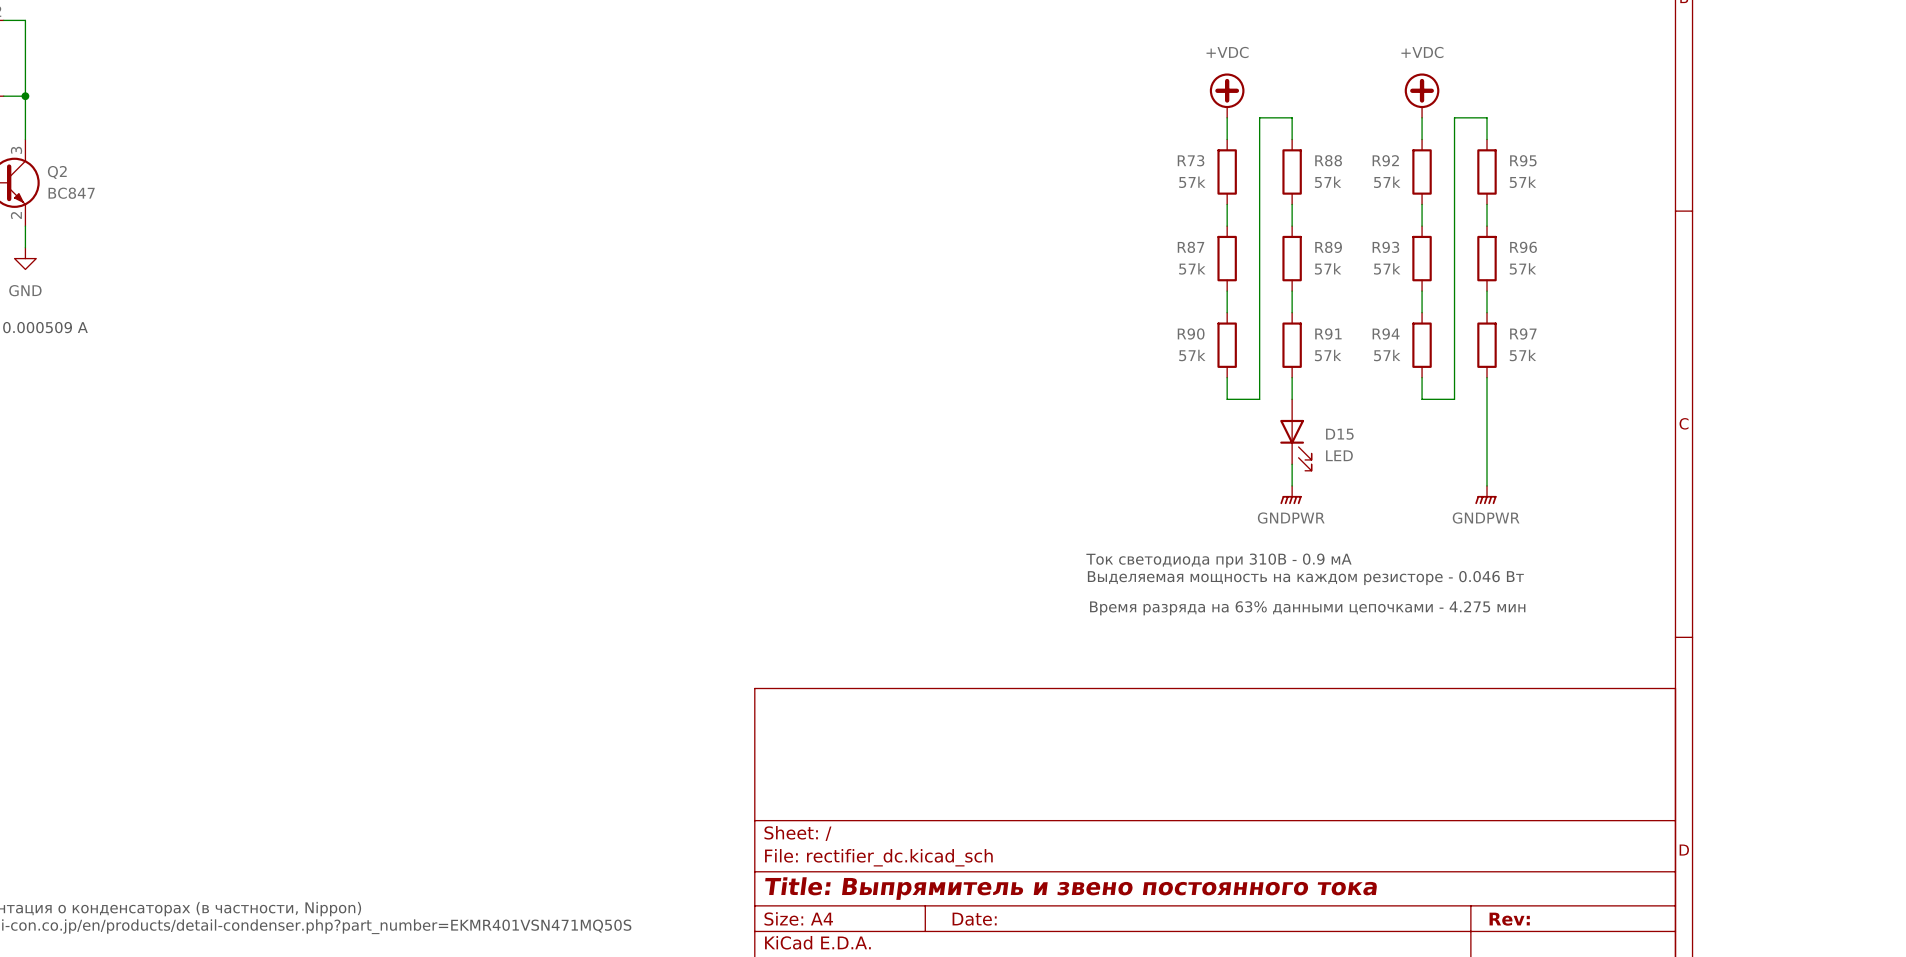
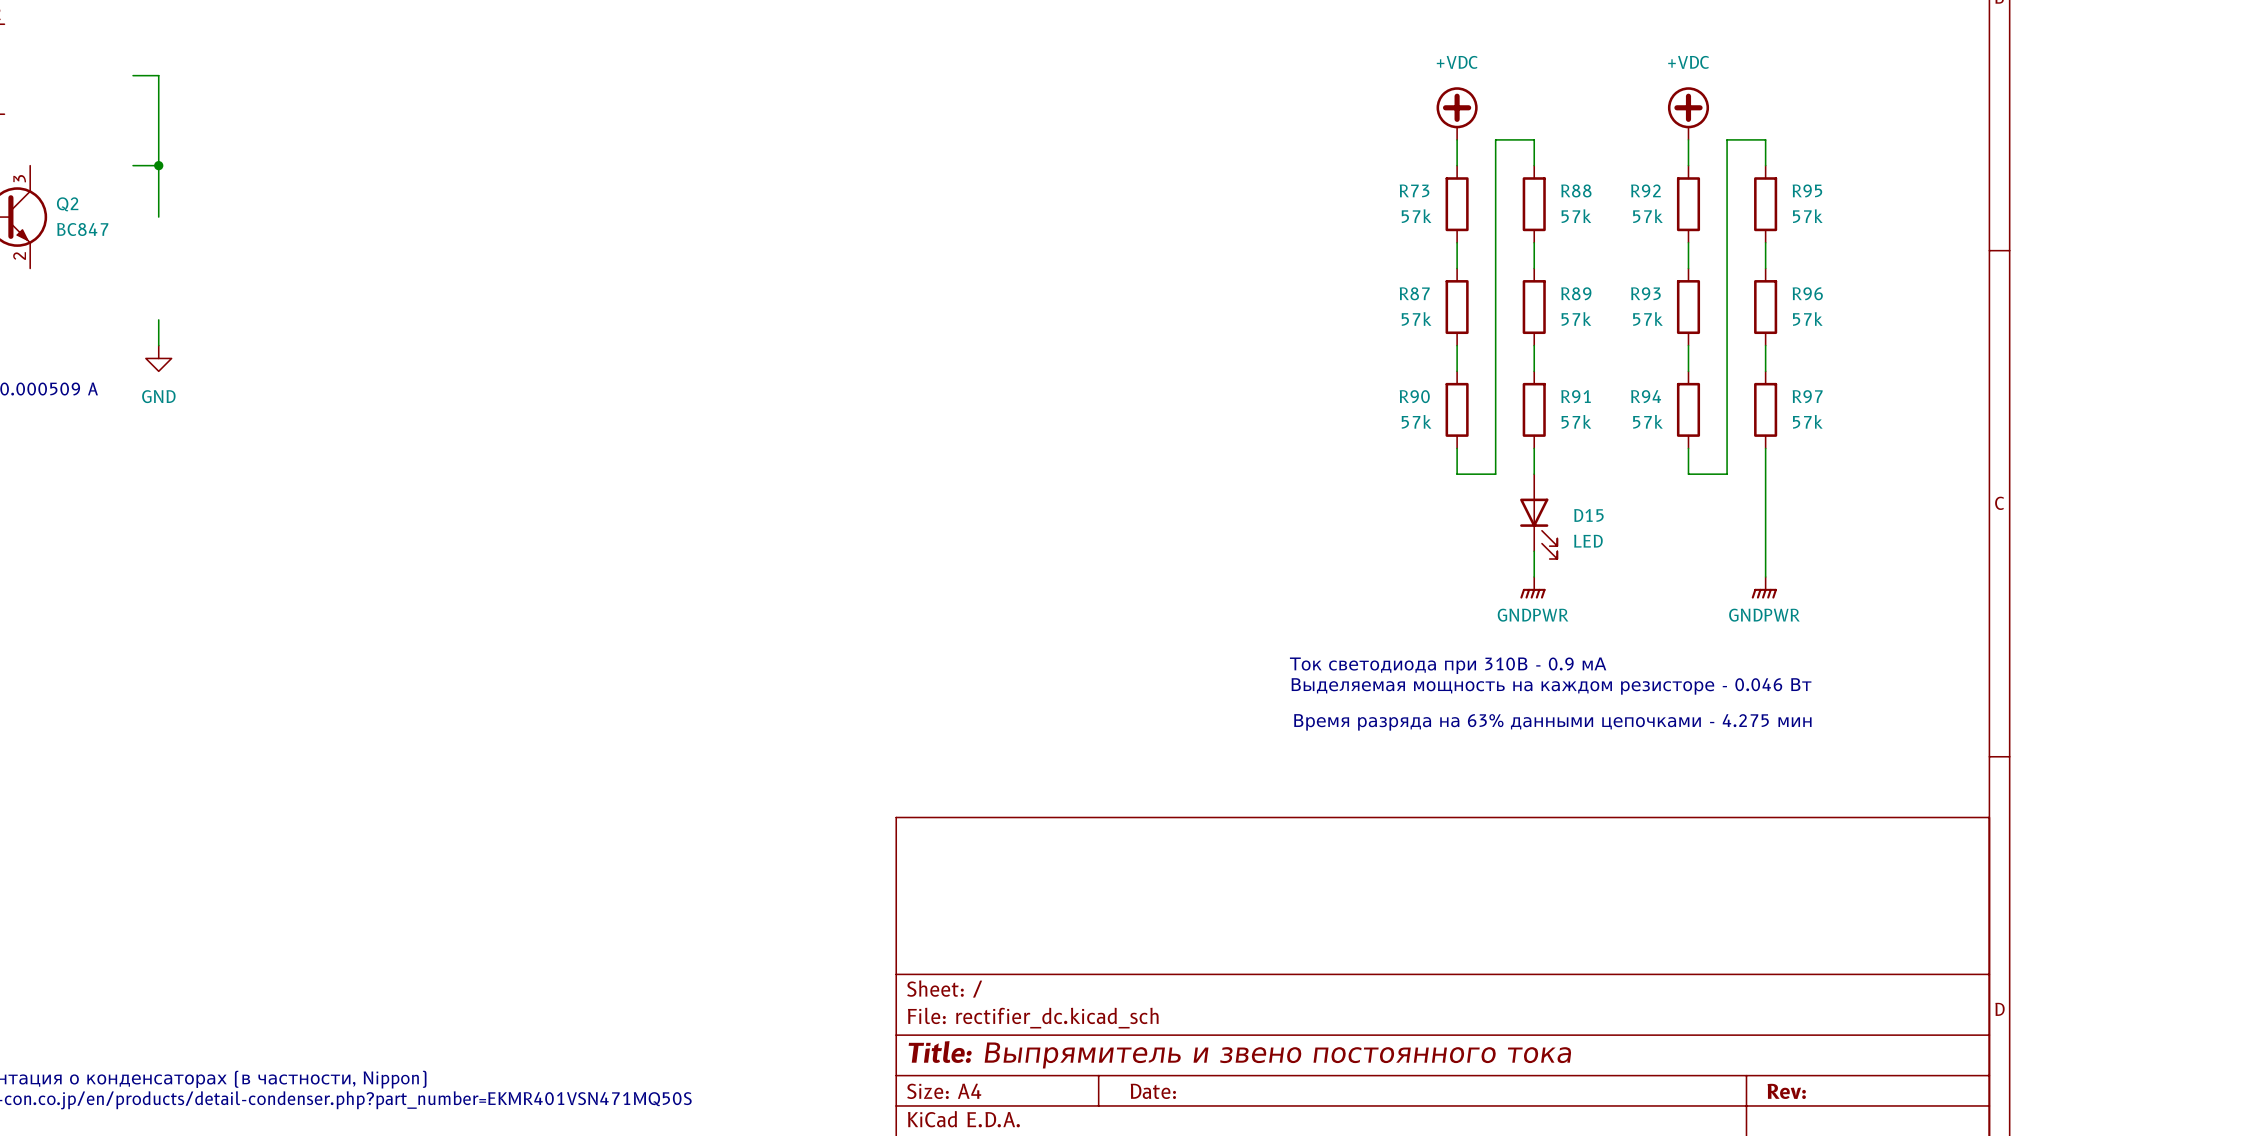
wire: (3, 20) (25, 20) (25, 139) -> (133, 75) (158, 75) (158, 217)
wire: (3, 96) (25, 96) -> (133, 165) (158, 165)
junction: (25, 96) -> none
junction: none -> (158, 165)
wire: (25, 226) (25, 247) -> (158, 319) (158, 345)
power symbol position: GND (25, 258) -> GND (158, 358)

